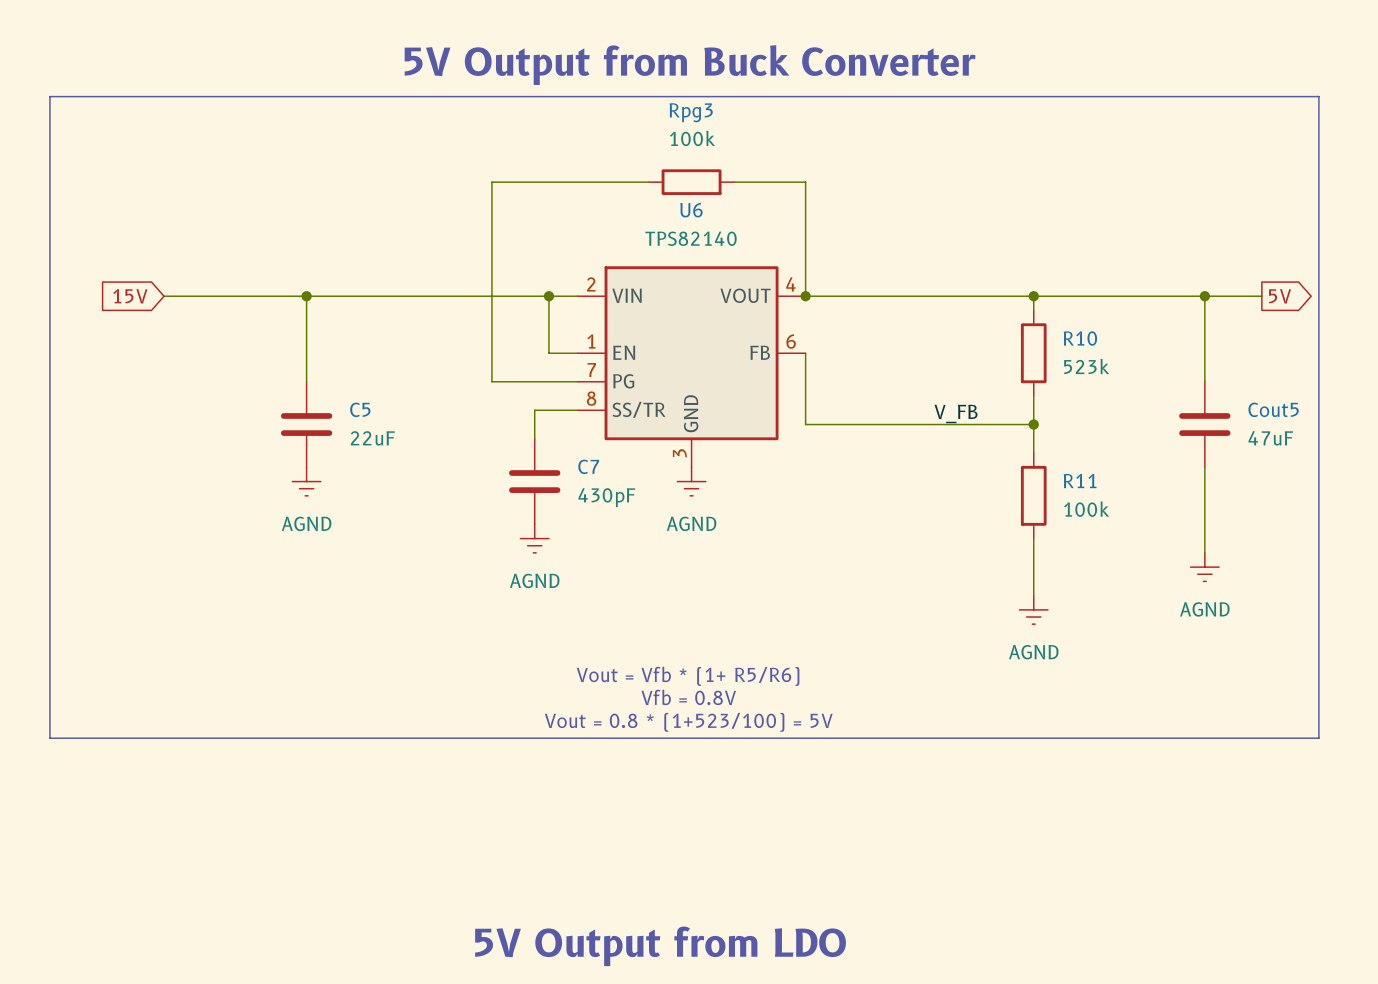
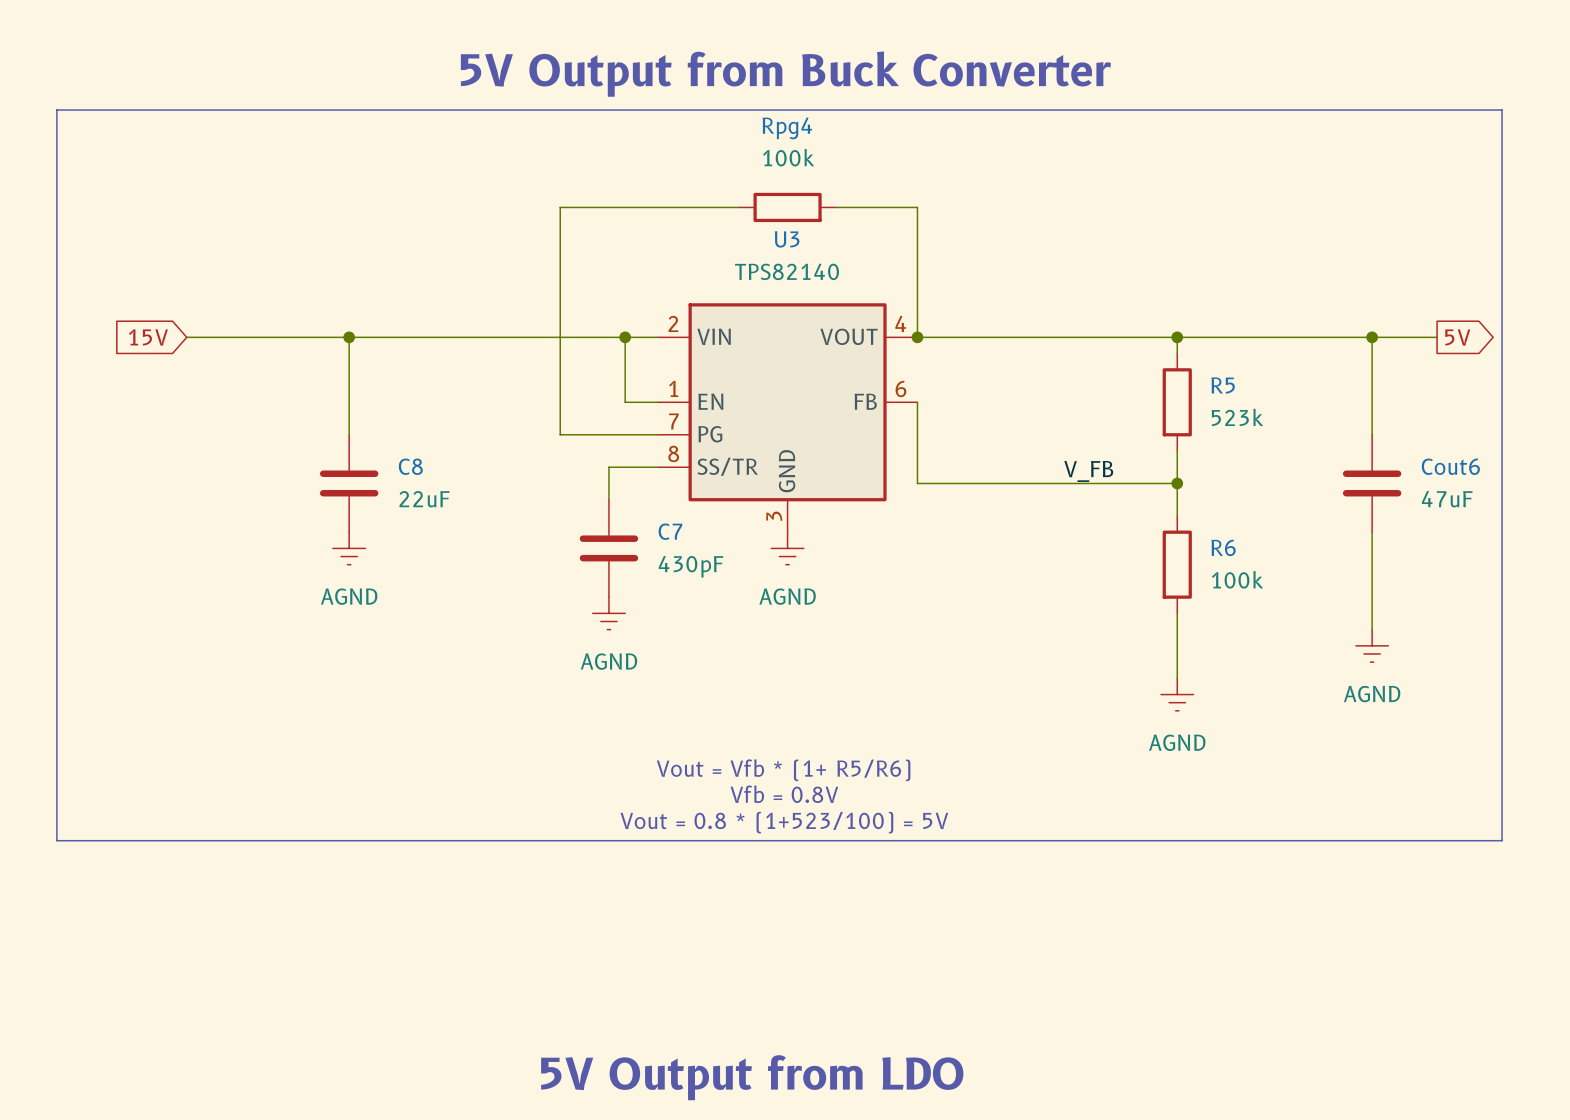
Rpg3 name: Rpg3 (691, 112) -> Rpg4 (787, 128)
U6 name: U6 (691, 210) -> U3 (787, 239)
R10 name: R10 (1080, 338) -> R5 (1223, 385)
C5 name: C5 (360, 409) -> C8 (410, 466)
Cout5 name: Cout5 (1273, 409) -> Cout6 (1450, 466)
R11 name: R11 (1080, 481) -> R6 (1223, 547)

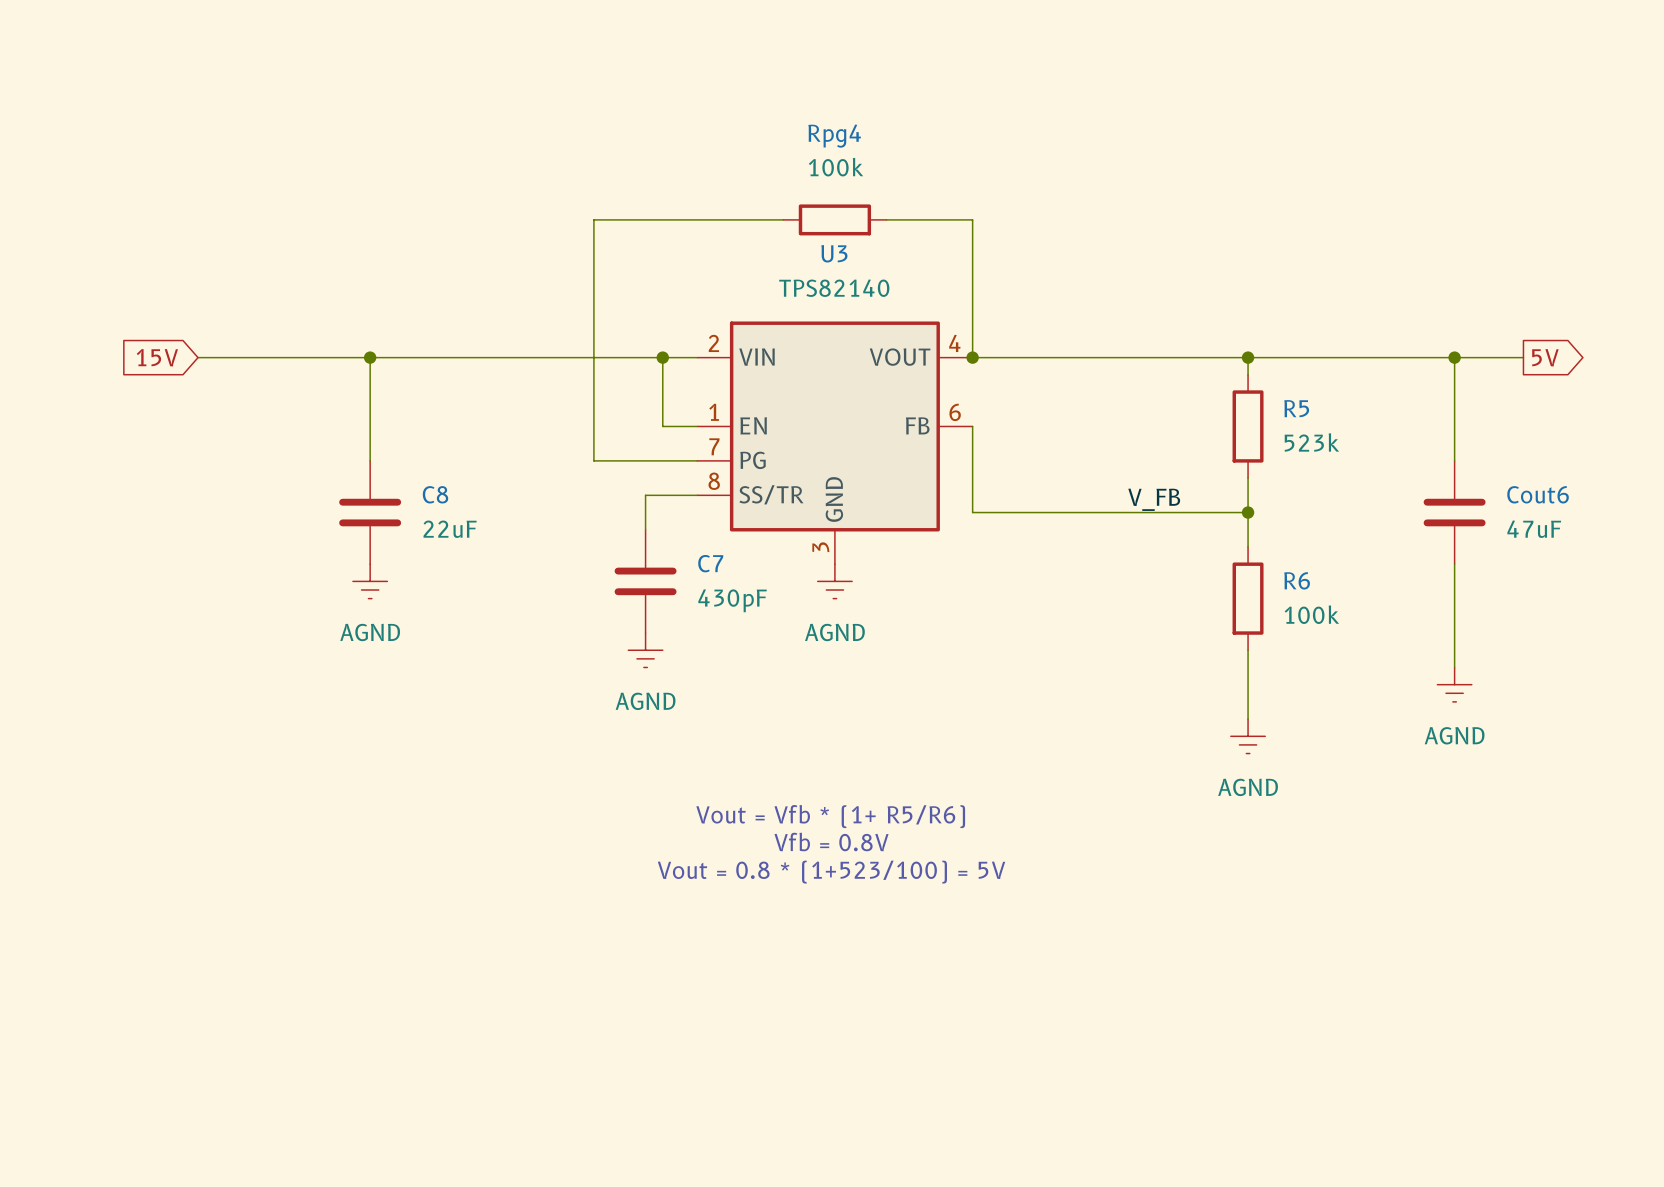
text: 5V Output from Buck Converter (785, 74) -> none
line: (56, 110) (1502, 110) (1502, 840) (56, 840) (56, 110) -> none
text: 5V Output from LDO (752, 1077) -> none

